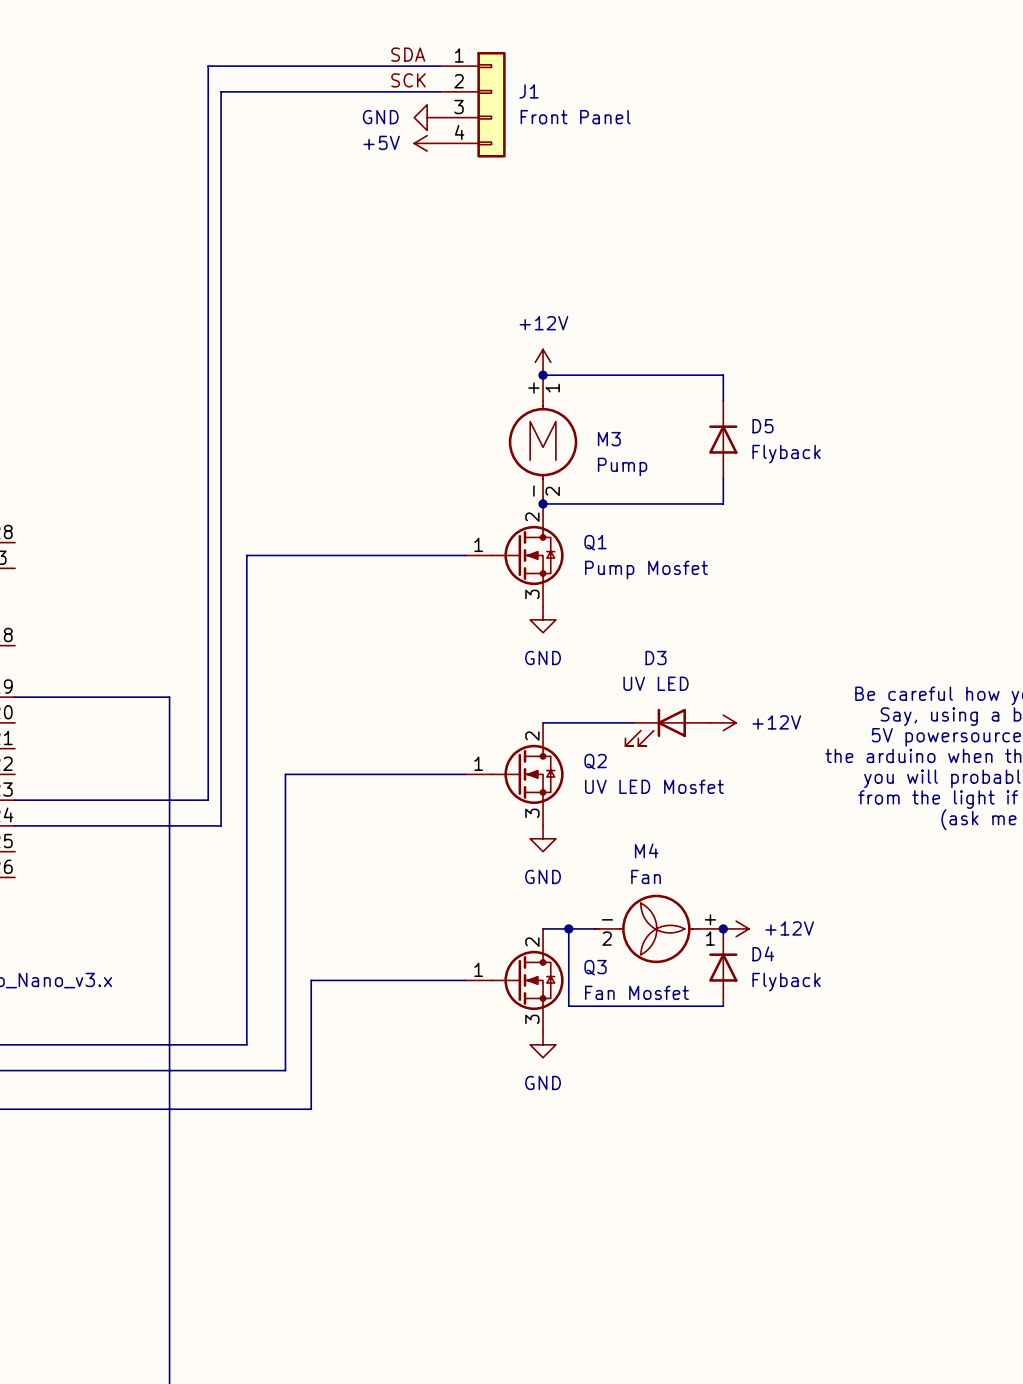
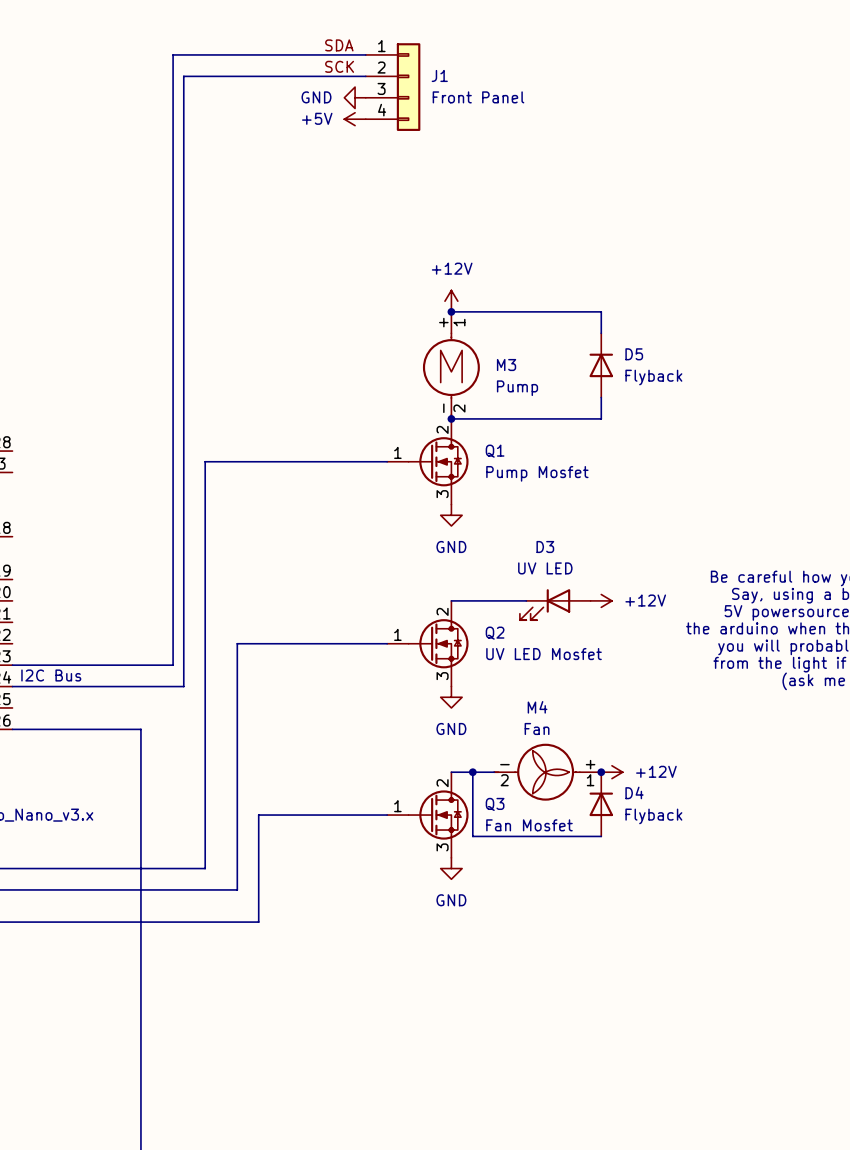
wire: (15, 697) (169, 697) (169, 877) -> (12, 729) (140, 729)
text: none -> I2C Bus (51, 675)

